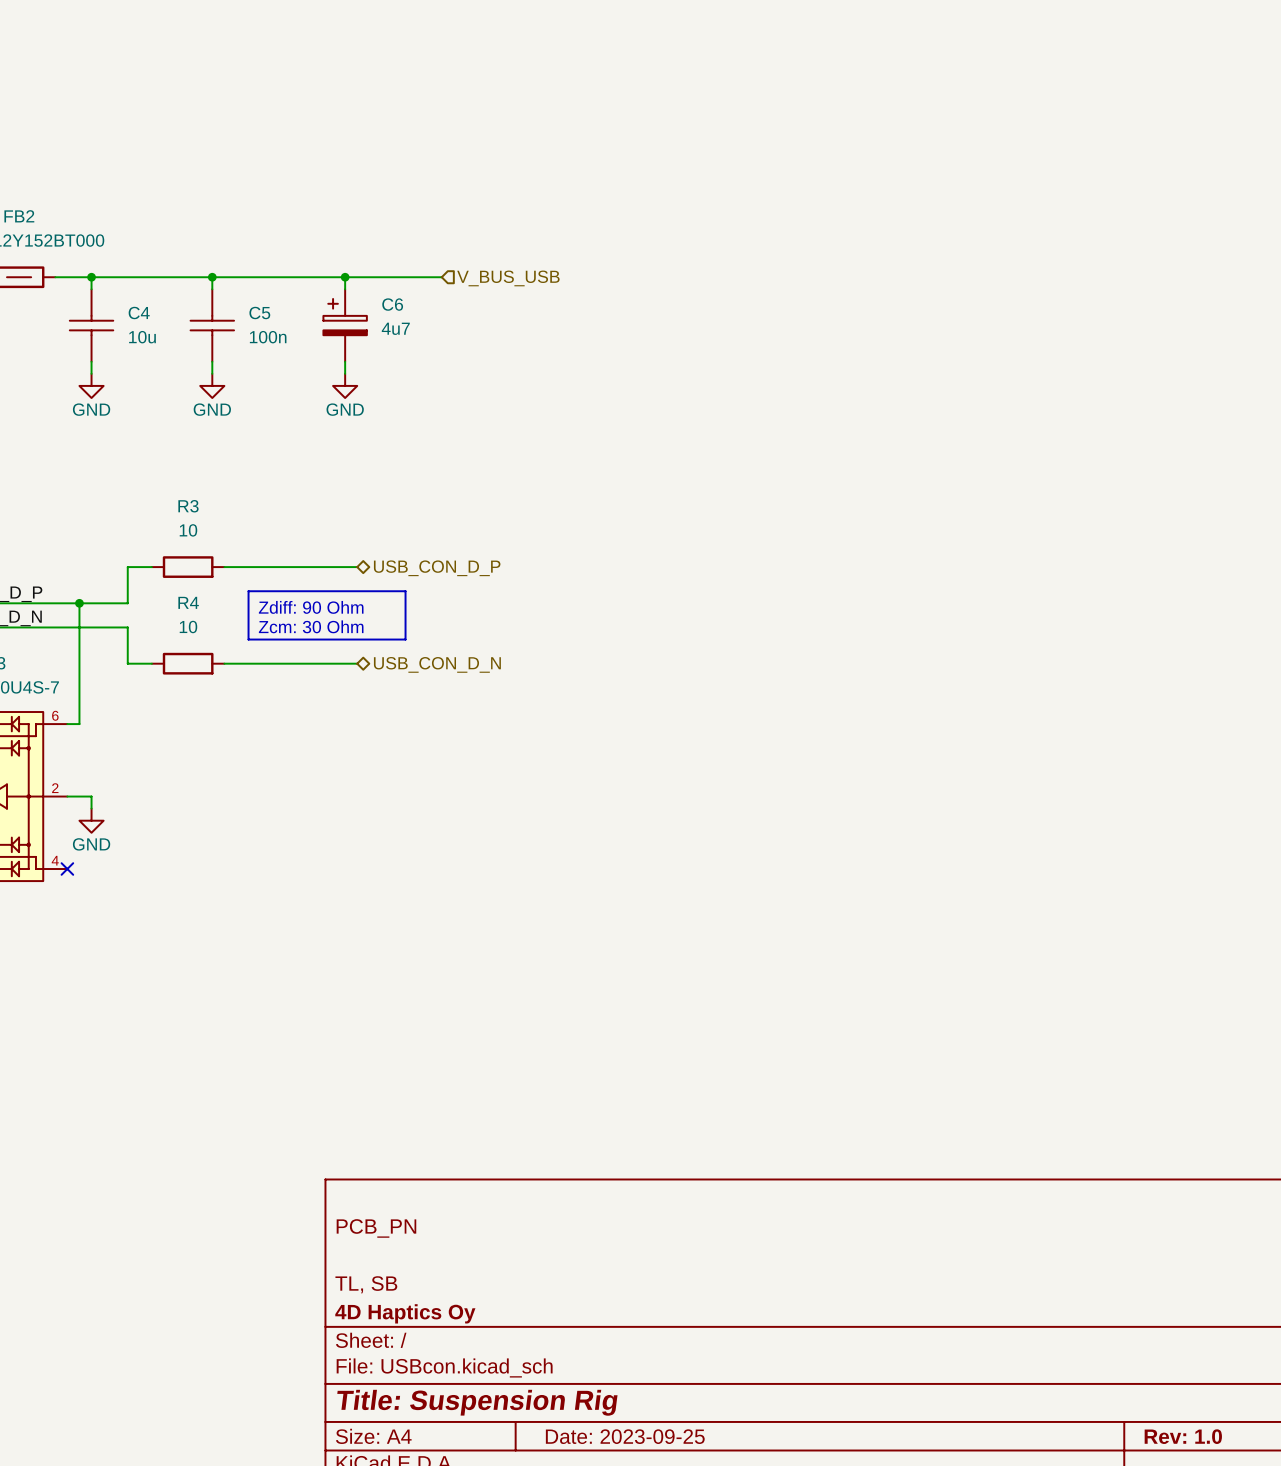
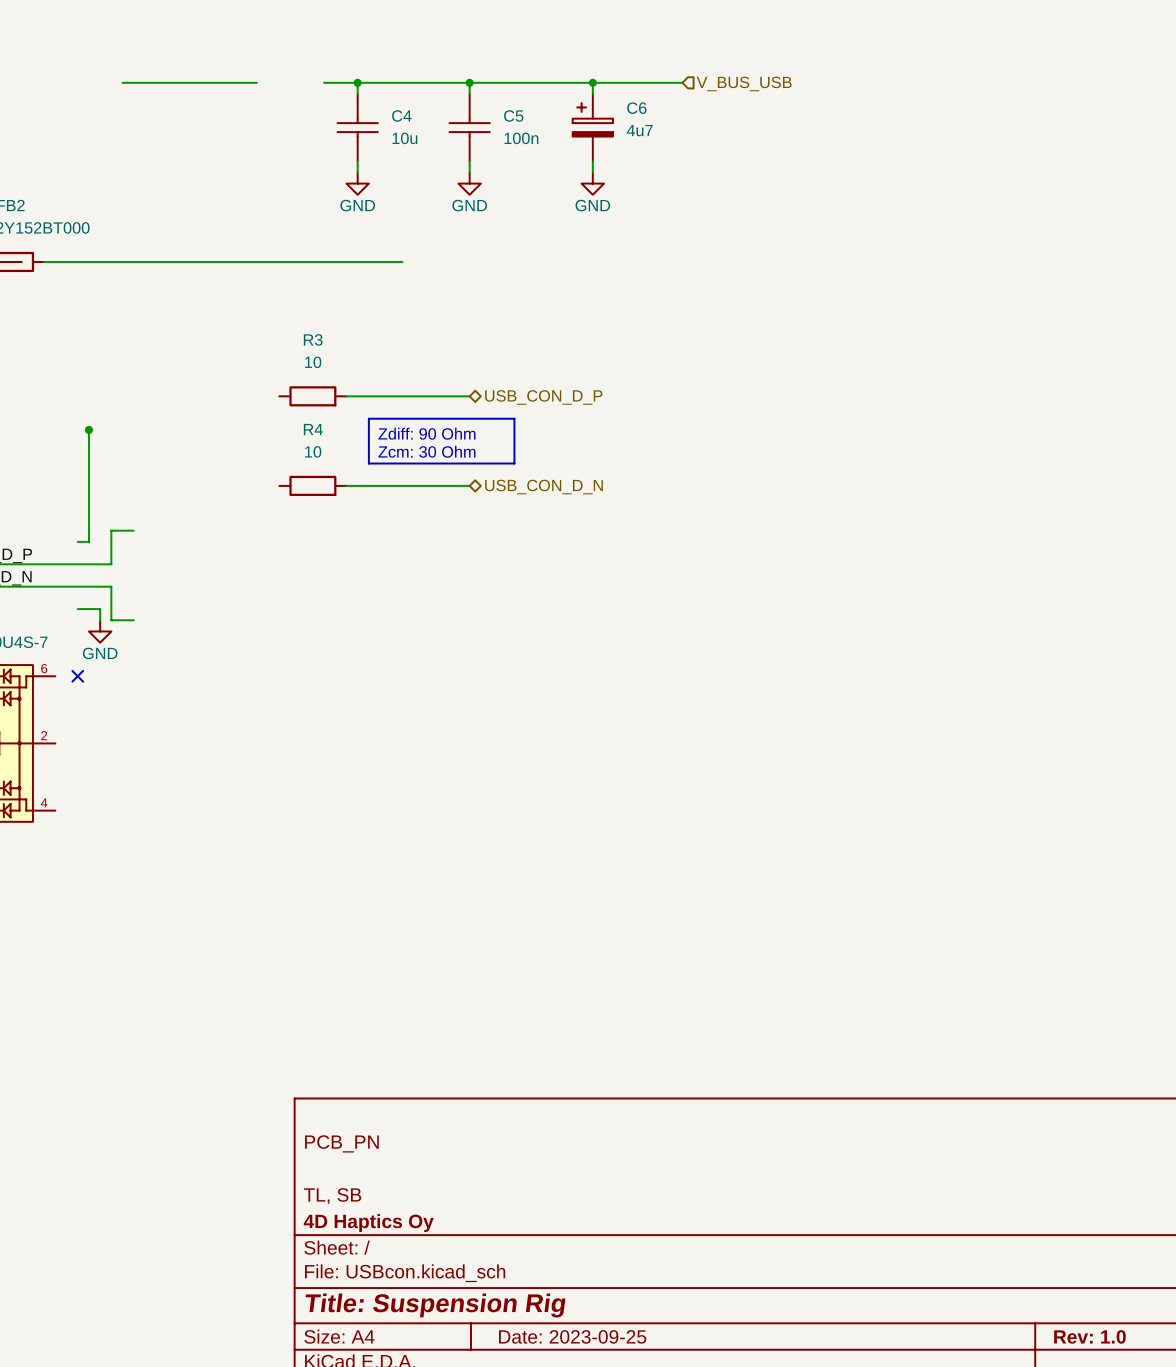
wire: none -> (122, 82) (256, 82)
wire: none -> (324, 82) (682, 82)
junction: none -> (357, 82)
wire: none -> (469, 82) (469, 94)
junction: none -> (469, 82)
wire: none -> (592, 82) (592, 94)
junction: none -> (592, 82)
hierarchical label: none -> V_BUS_USB (744, 83)
wire: none -> (469, 161) (469, 172)
wire: none -> (592, 161) (592, 172)
power symbol: none -> GND (357, 183)
power symbol: none -> GND (469, 183)
power symbol: none -> GND (592, 183)
wire: (91, 277) (91, 289) -> none
junction: (91, 277) -> none
wire: (212, 277) (212, 289) -> none
junction: (212, 277) -> none
wire: (345, 277) (345, 289) -> (357, 82) (357, 94)
junction: (345, 277) -> none
hierarchical label: V_BUS_USB (508, 278) -> none
C4 position: (91, 325) -> (357, 127)
C5 position: (212, 325) -> (469, 127)
C6 position: (345, 325) -> (592, 127)
wire: (91, 361) (91, 373) -> none
wire: (212, 361) (212, 373) -> none
wire: (345, 361) (345, 373) -> (357, 161) (357, 172)
power symbol: GND (91, 385) -> none
power symbol: GND (212, 385) -> none
power symbol: GND (345, 385) -> none
junction: none -> (88, 429)
R3 position: (188, 567) -> (312, 396)
wire: (224, 567) (357, 567) -> (346, 396) (469, 396)
hierarchical label position: USB_CON_D_P (437, 568) -> USB_CON_D_P (543, 397)
line: (248, 591) (405, 591) (405, 639) (248, 639) (248, 591) -> (368, 418) (514, 418) (514, 463) (368, 463) (368, 418)
wire: (79, 603) (79, 724) (67, 724) -> (88, 429) (88, 541) (77, 541)
junction: (79, 603) -> none
text position: Zdiff: 90 Ohm (311, 607) -> Zdiff: 90 Ohm (426, 433)
text position: Zcm: 30 Ohm (311, 626) -> Zcm: 30 Ohm (426, 451)
R4 position: (188, 663) -> (312, 485)
wire: (224, 663) (357, 663) -> (346, 485) (469, 485)
hierarchical label position: USB_CON_D_N (437, 664) -> USB_CON_D_N (543, 487)
power symbol: none -> GND (100, 631)
no-connect mark: none -> (77, 676)
wire: (67, 796) (91, 796) (91, 808) -> (77, 609) (100, 609) (100, 620)
power symbol: GND (91, 820) -> none
no-connect mark: (67, 869) -> none

